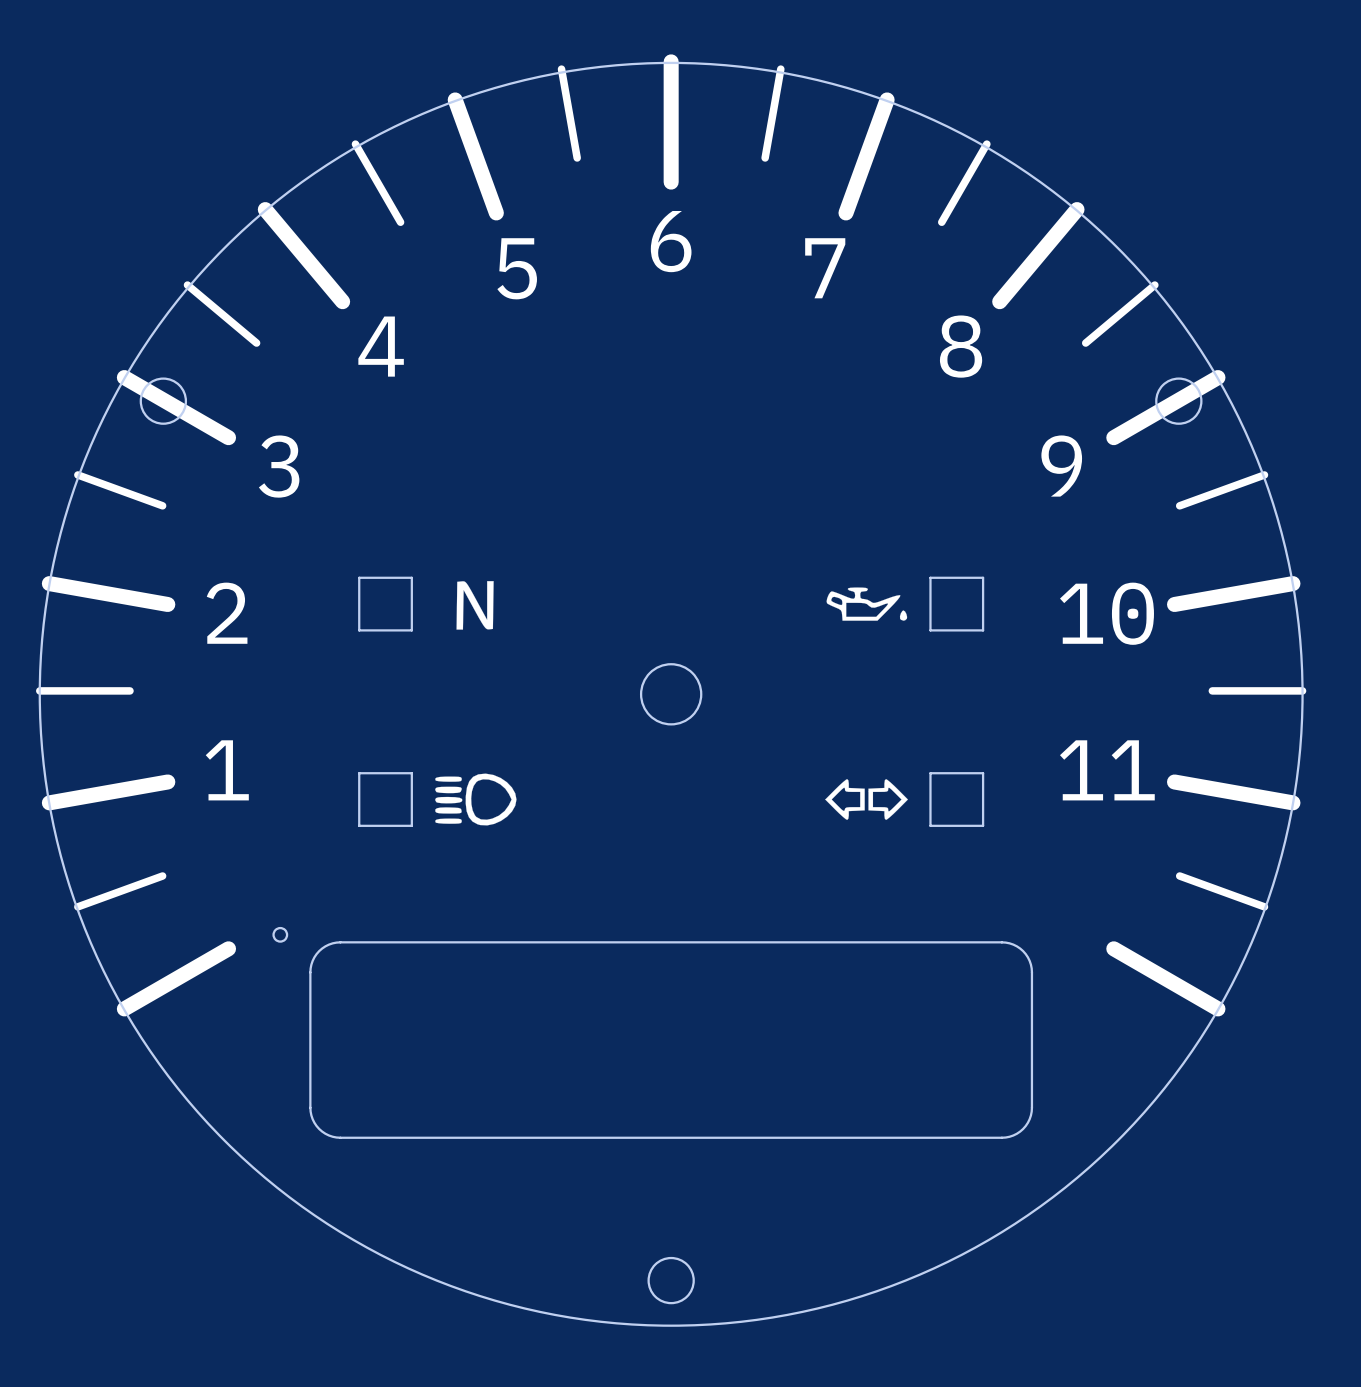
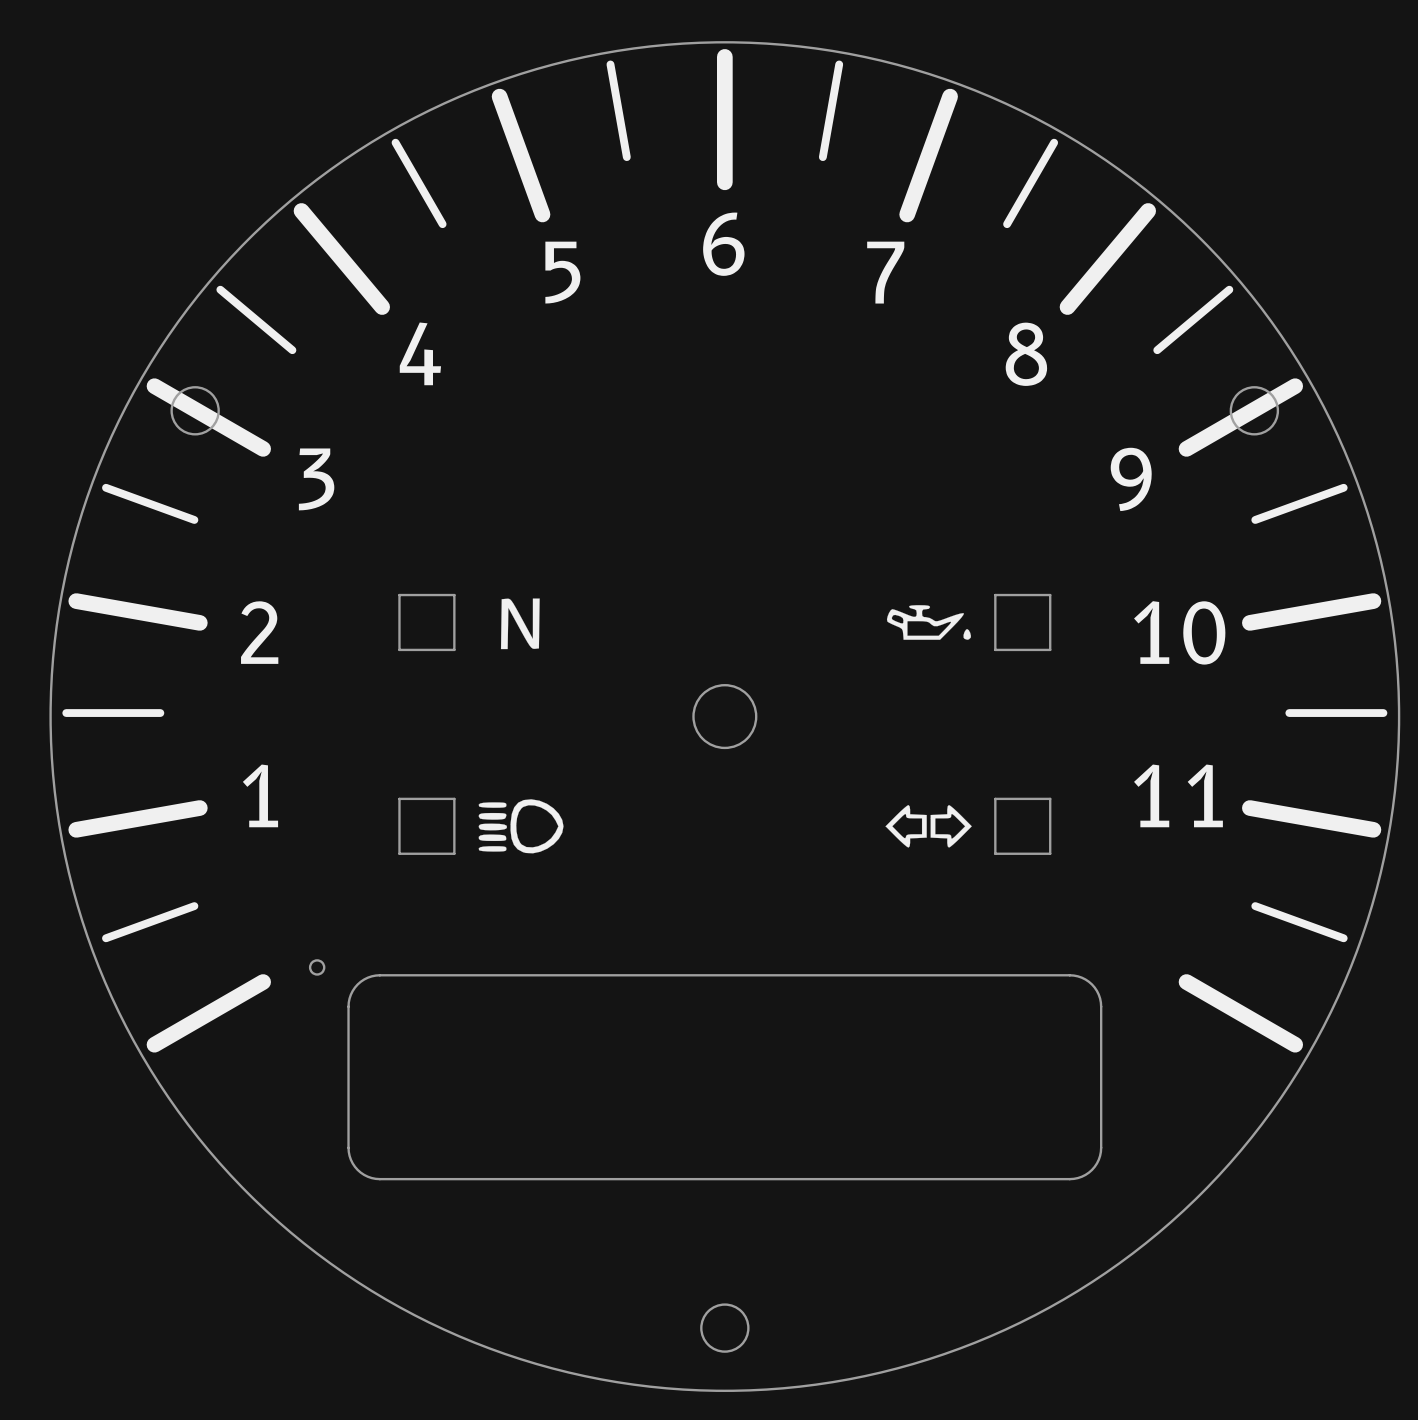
round board edge size: [38, 61, 1304, 1327] -> [49, 41, 1401, 1392]

